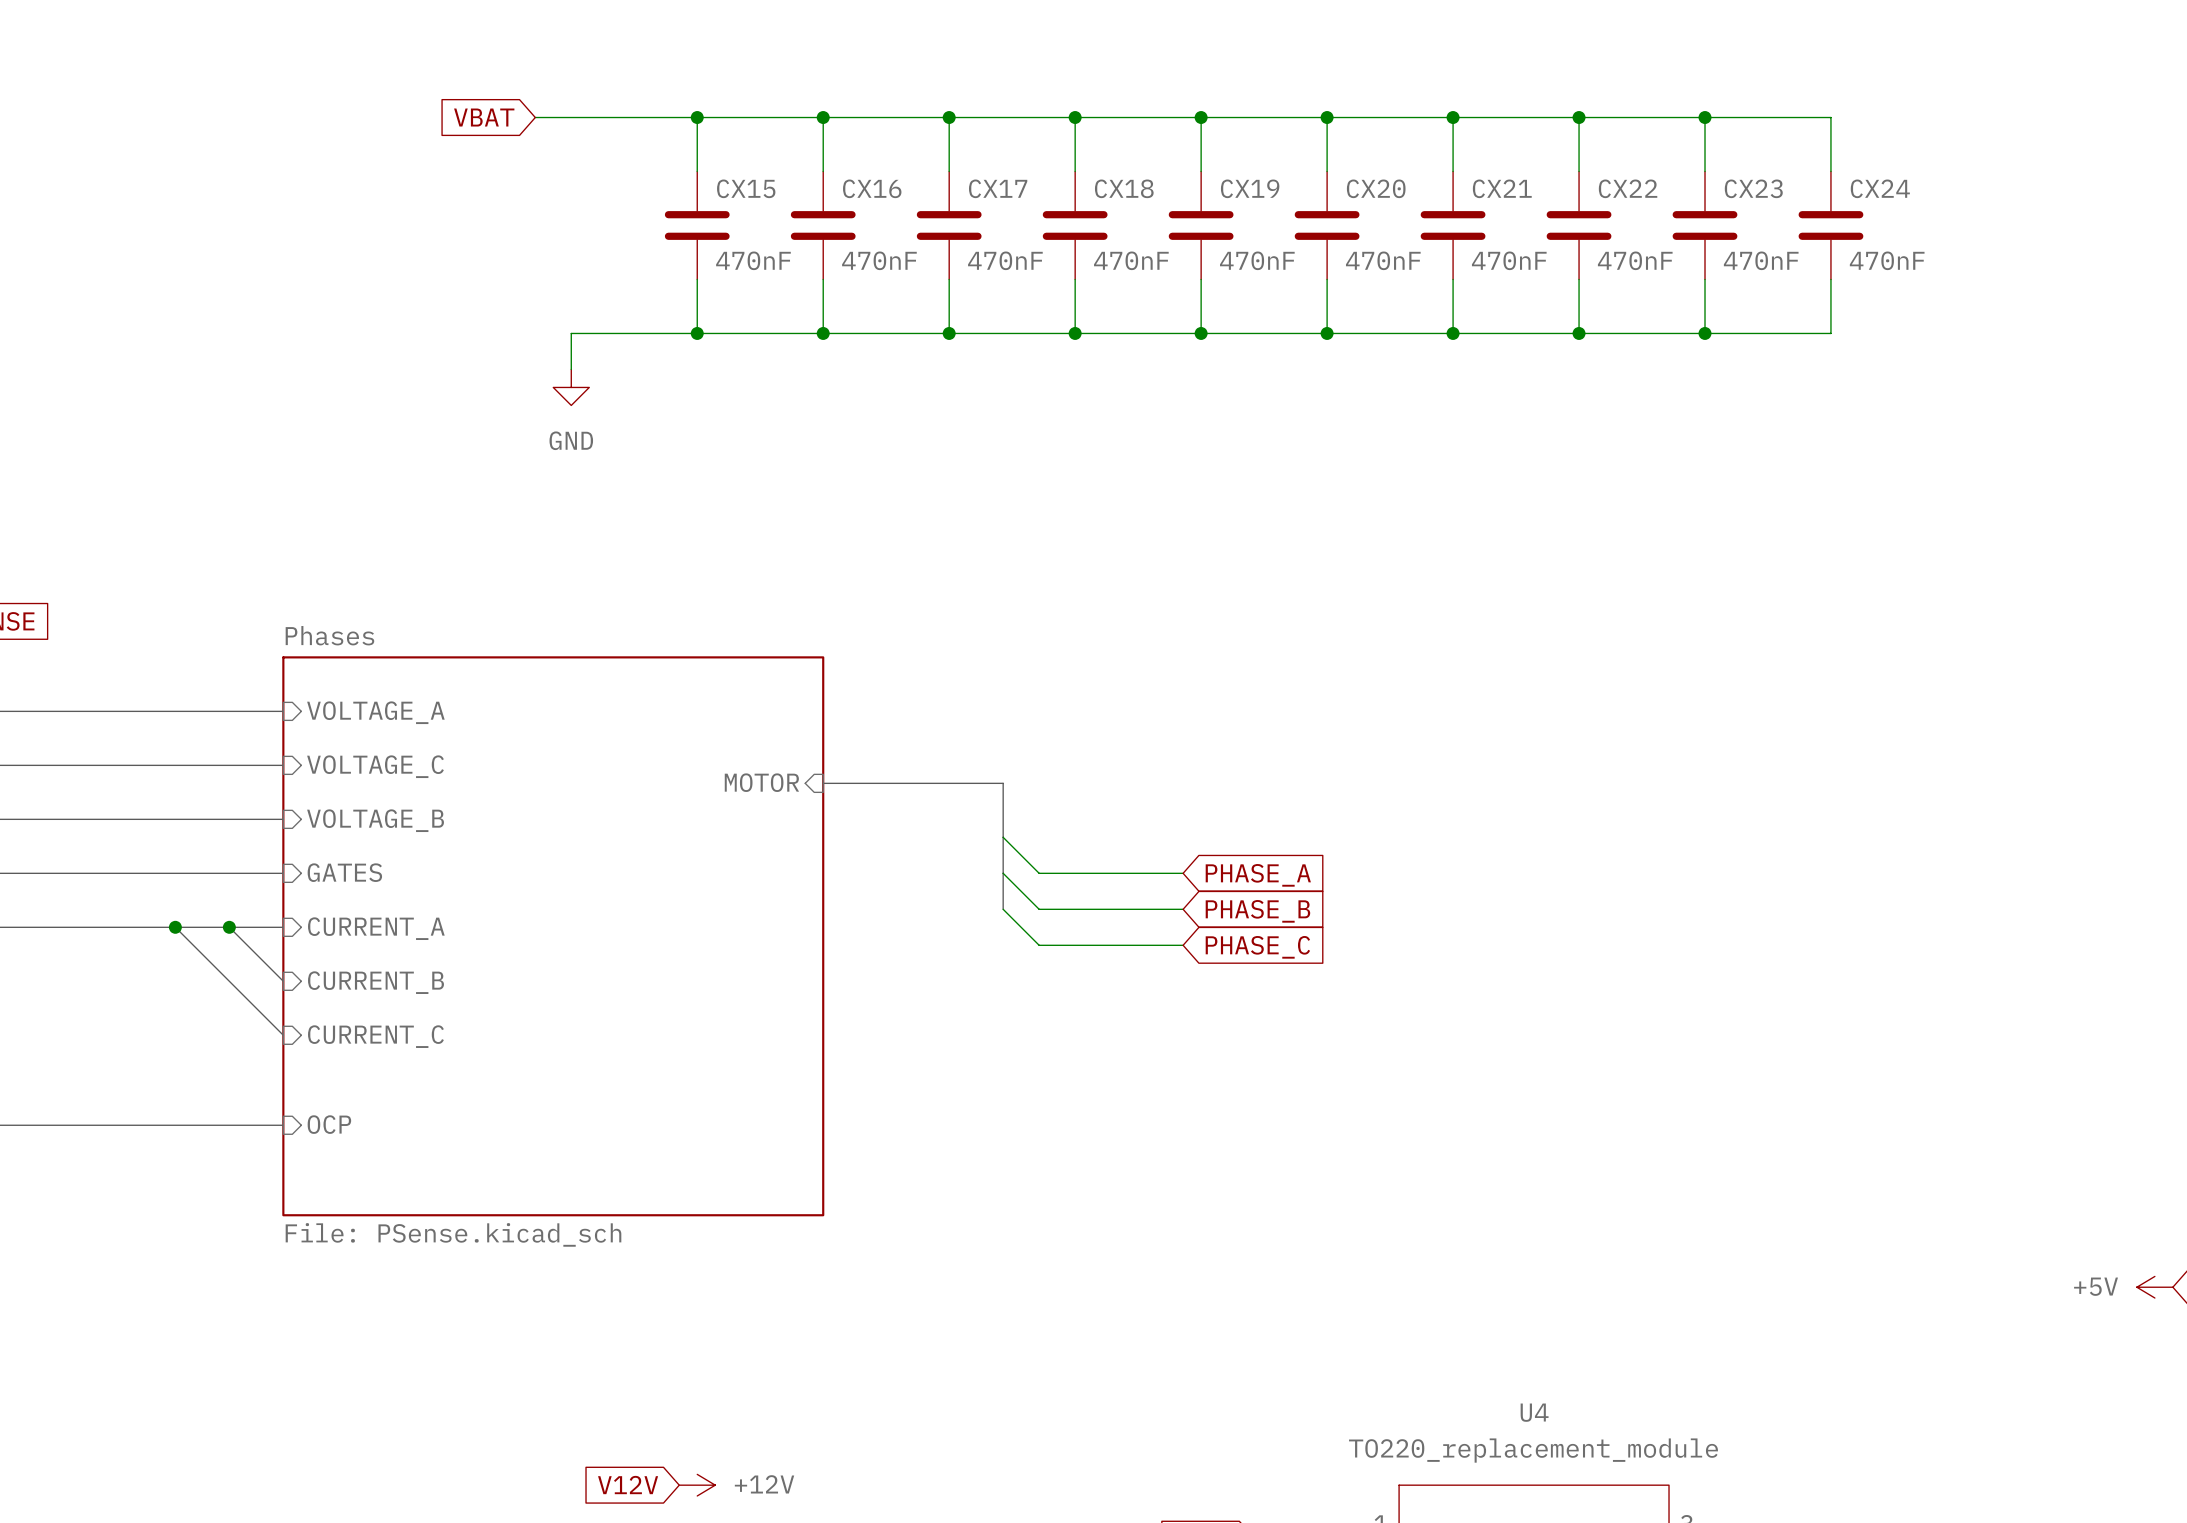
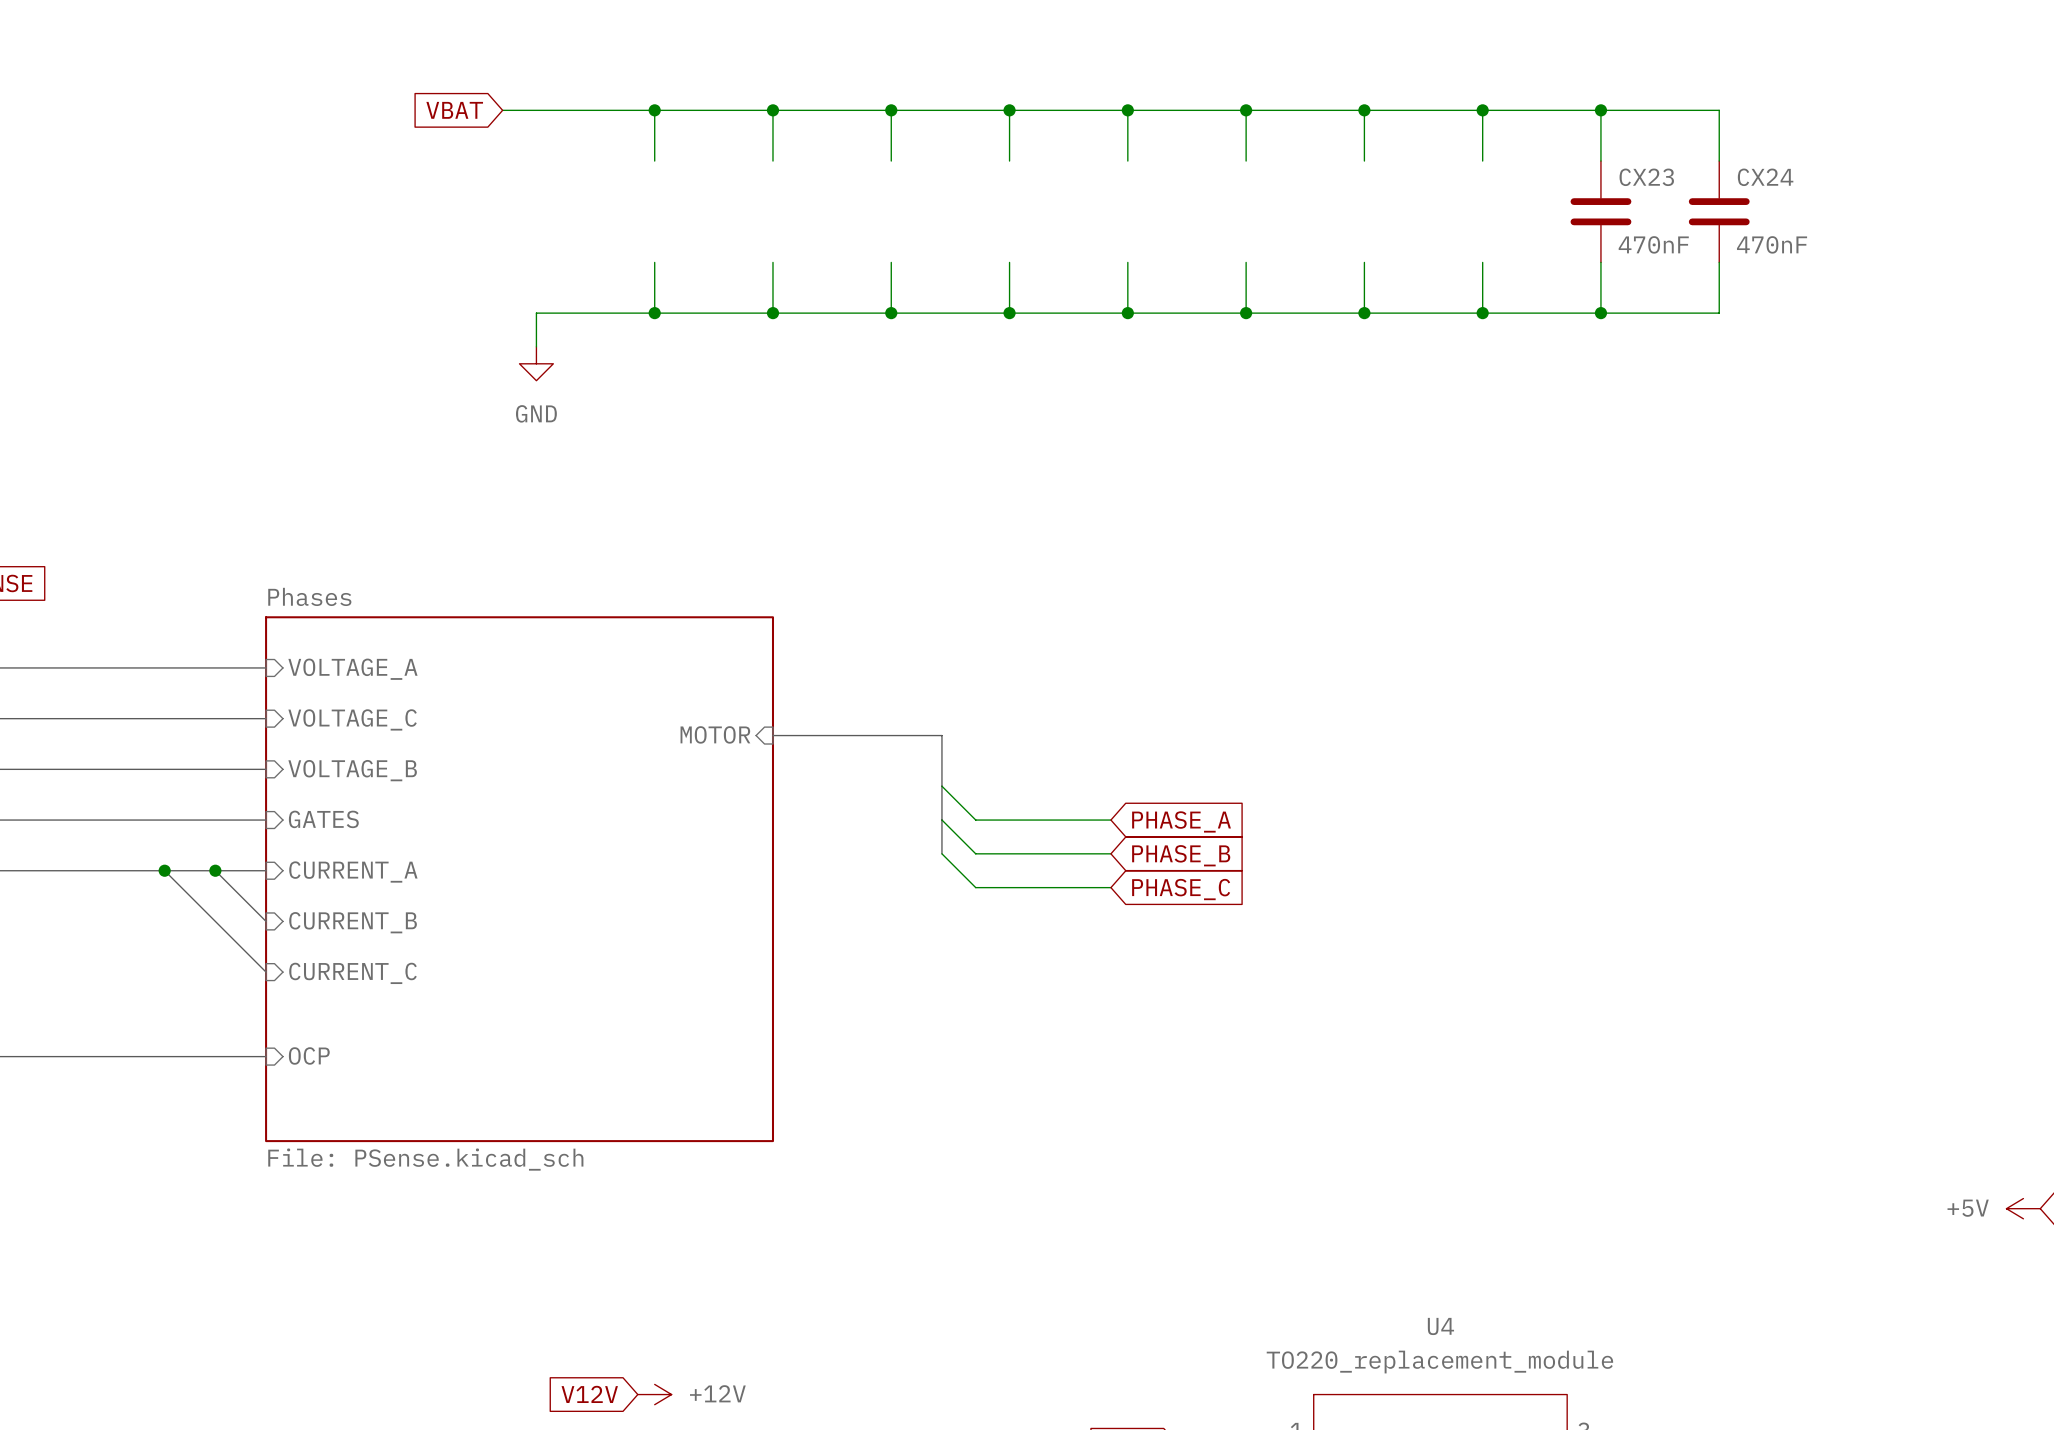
CX15: 470nF (697, 225) -> none
CX16: 470nF (823, 225) -> none
CX17: 470nF (949, 225) -> none
CX18: 470nF (1075, 225) -> none
CX19: 470nF (1201, 225) -> none
CX20: 470nF (1327, 225) -> none
CX21: 470nF (1453, 225) -> none
CX22: 470nF (1579, 225) -> none

